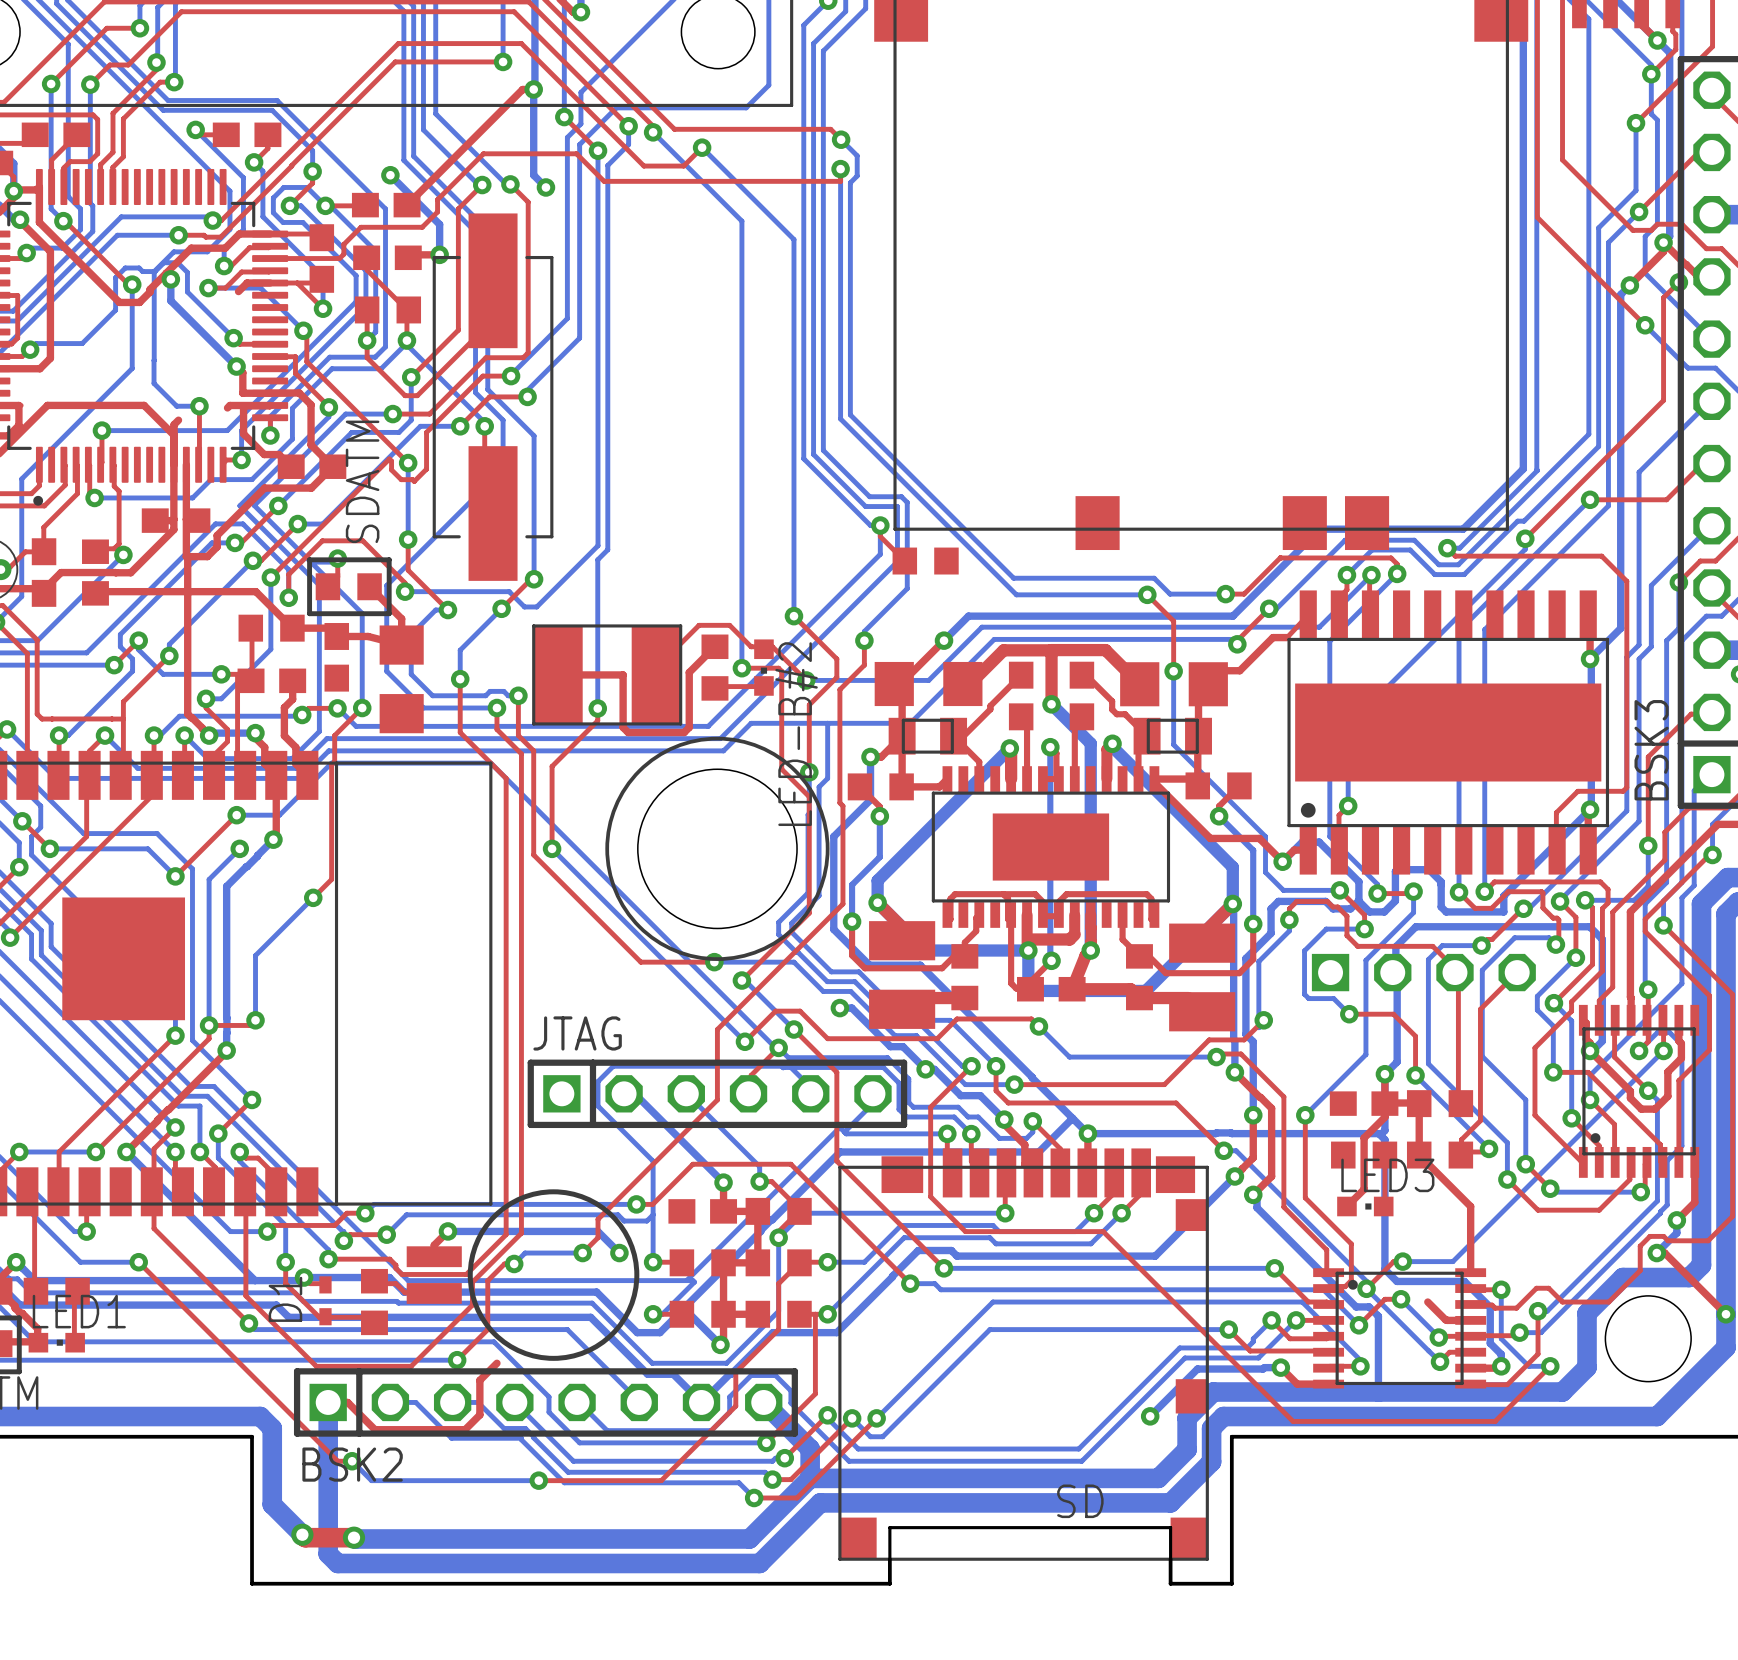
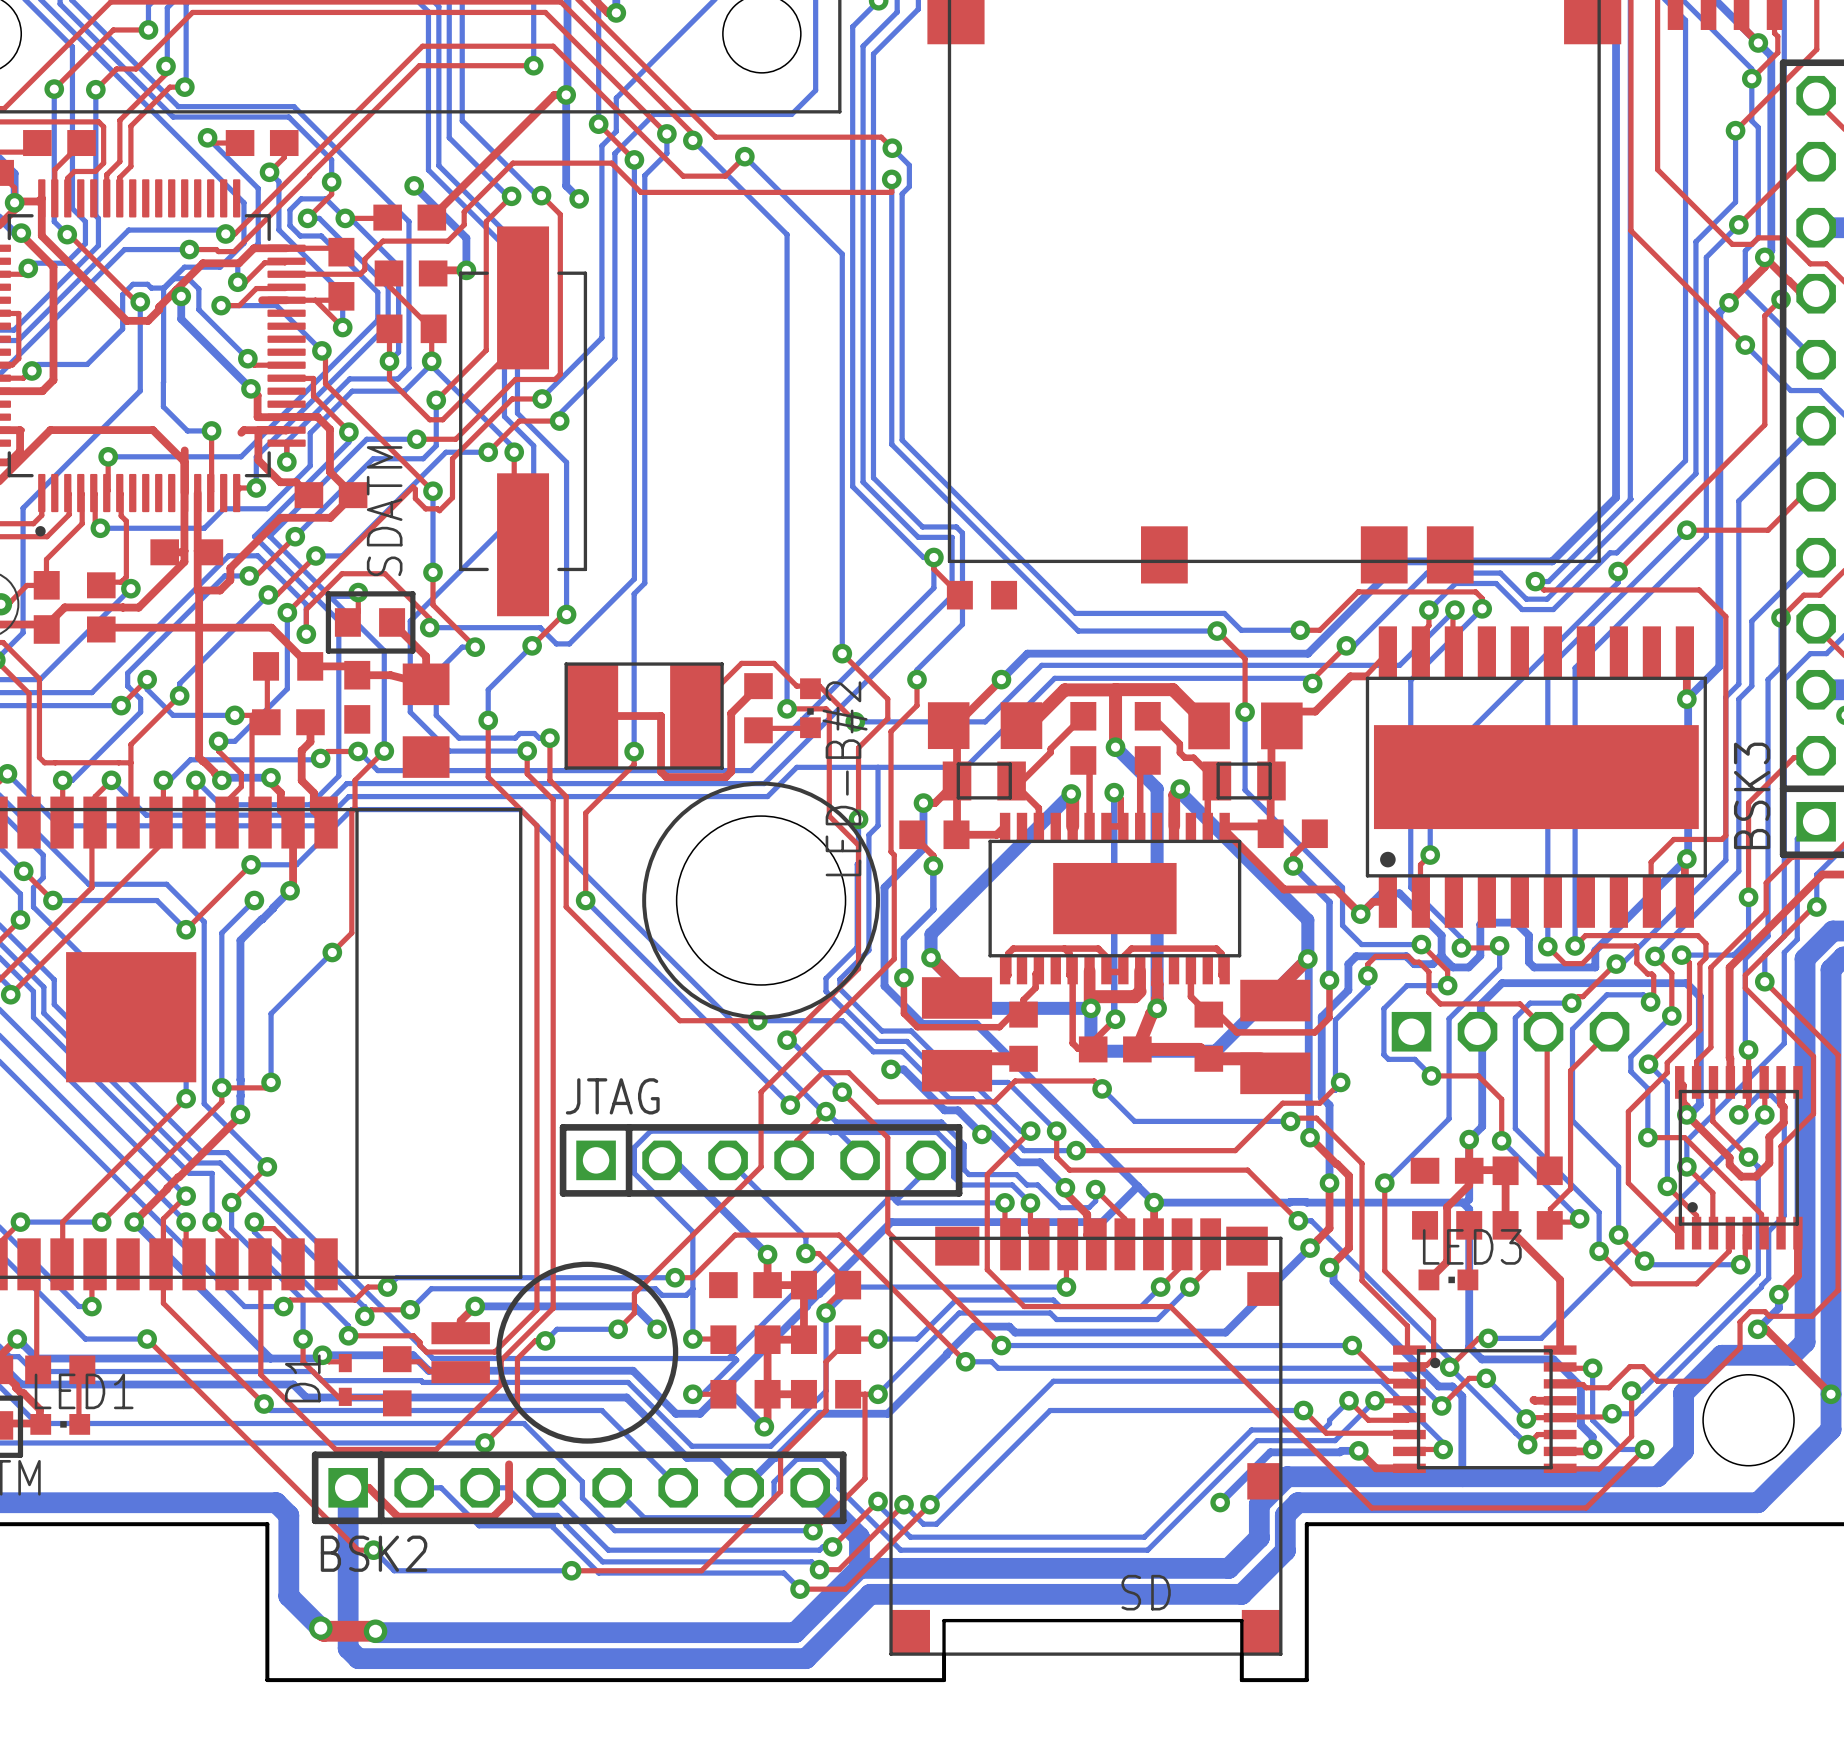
top track: (247, 283) (238, 291) -> none
top track: (178, 420) (174, 424) -> none
top track: (1427, 1302) (1445, 1319) -> none
top track: (496, 1363) (479, 1380) -> none

